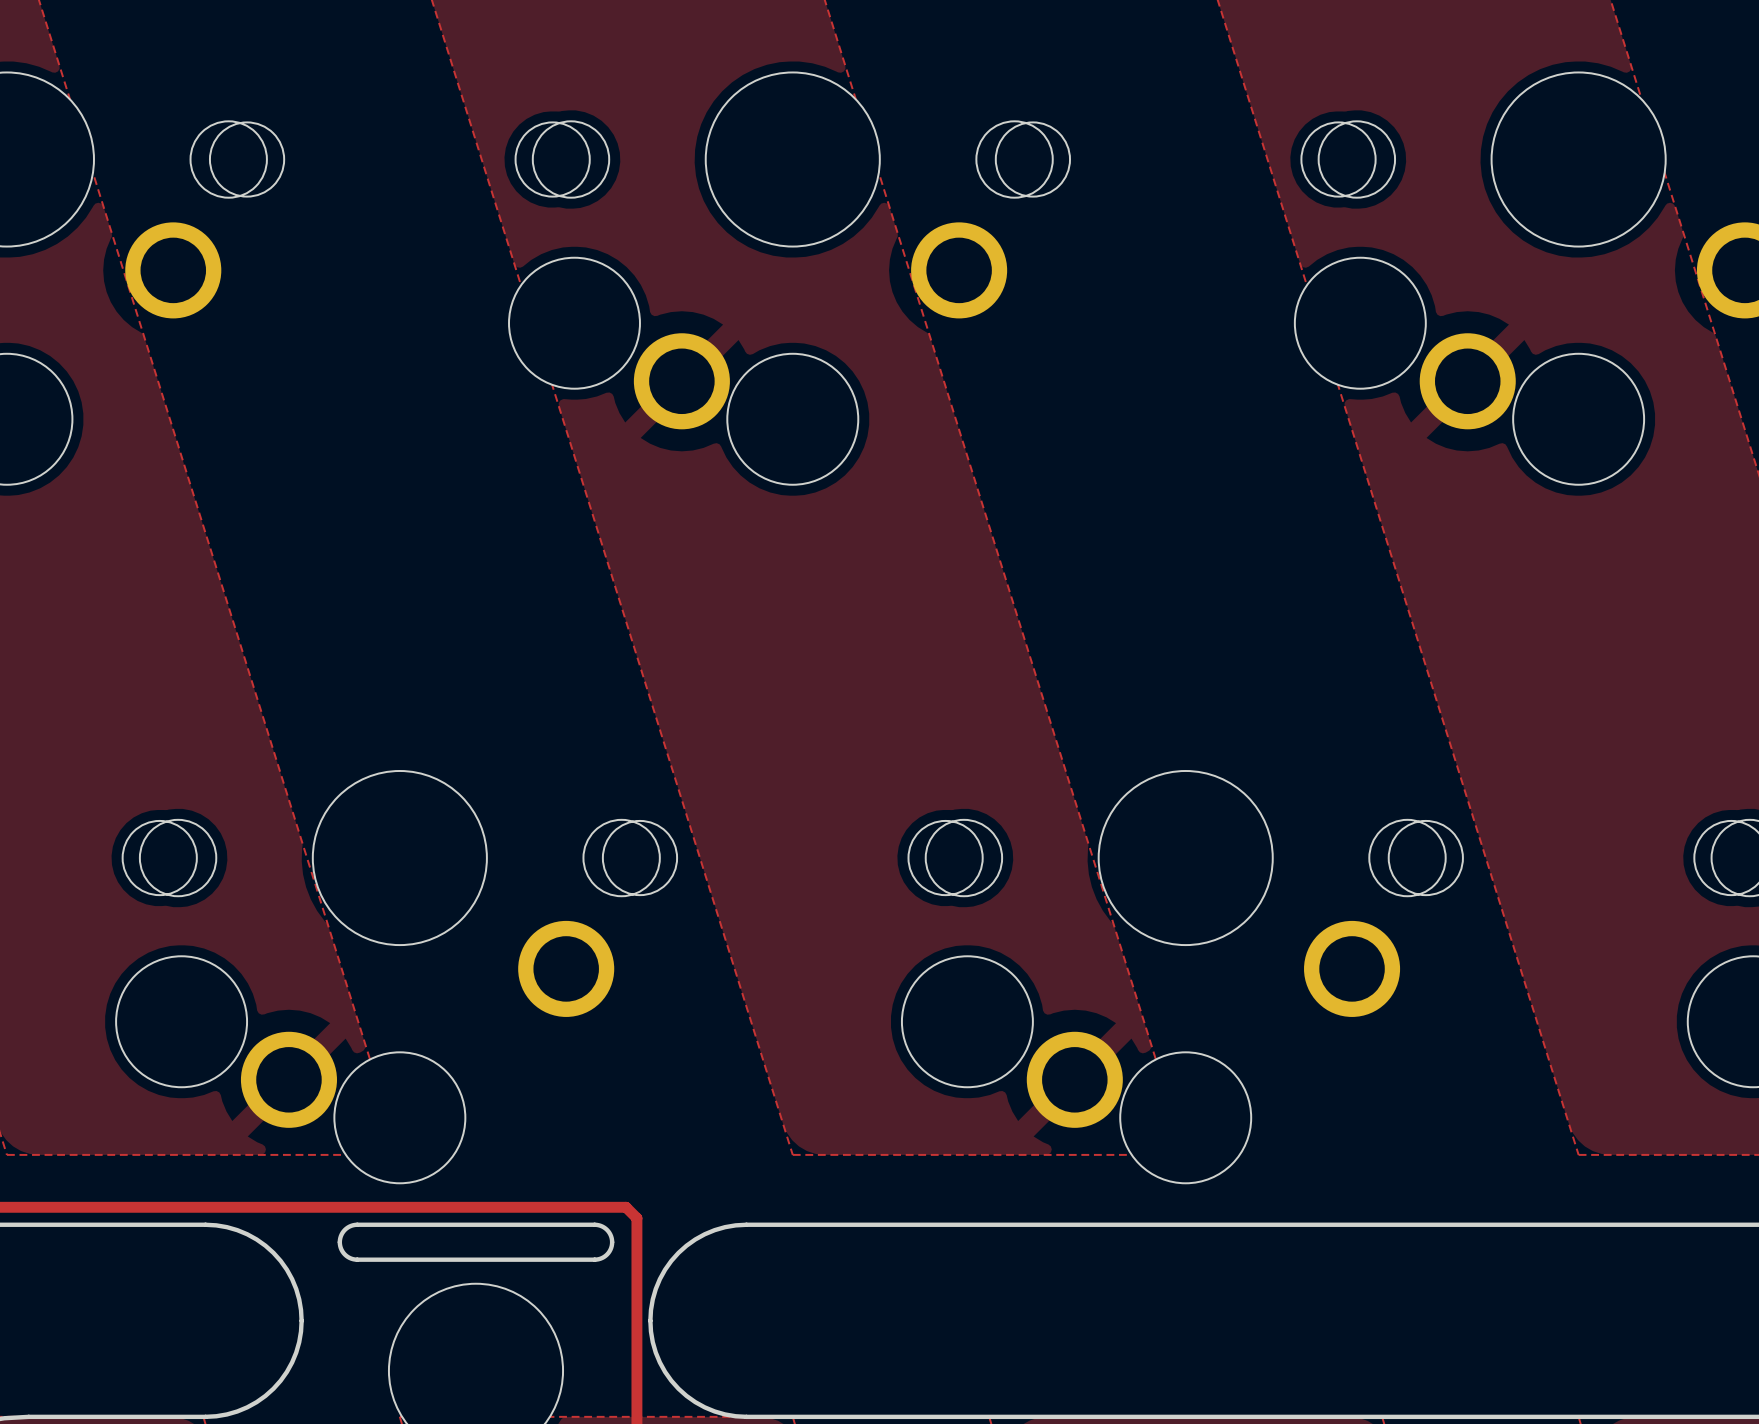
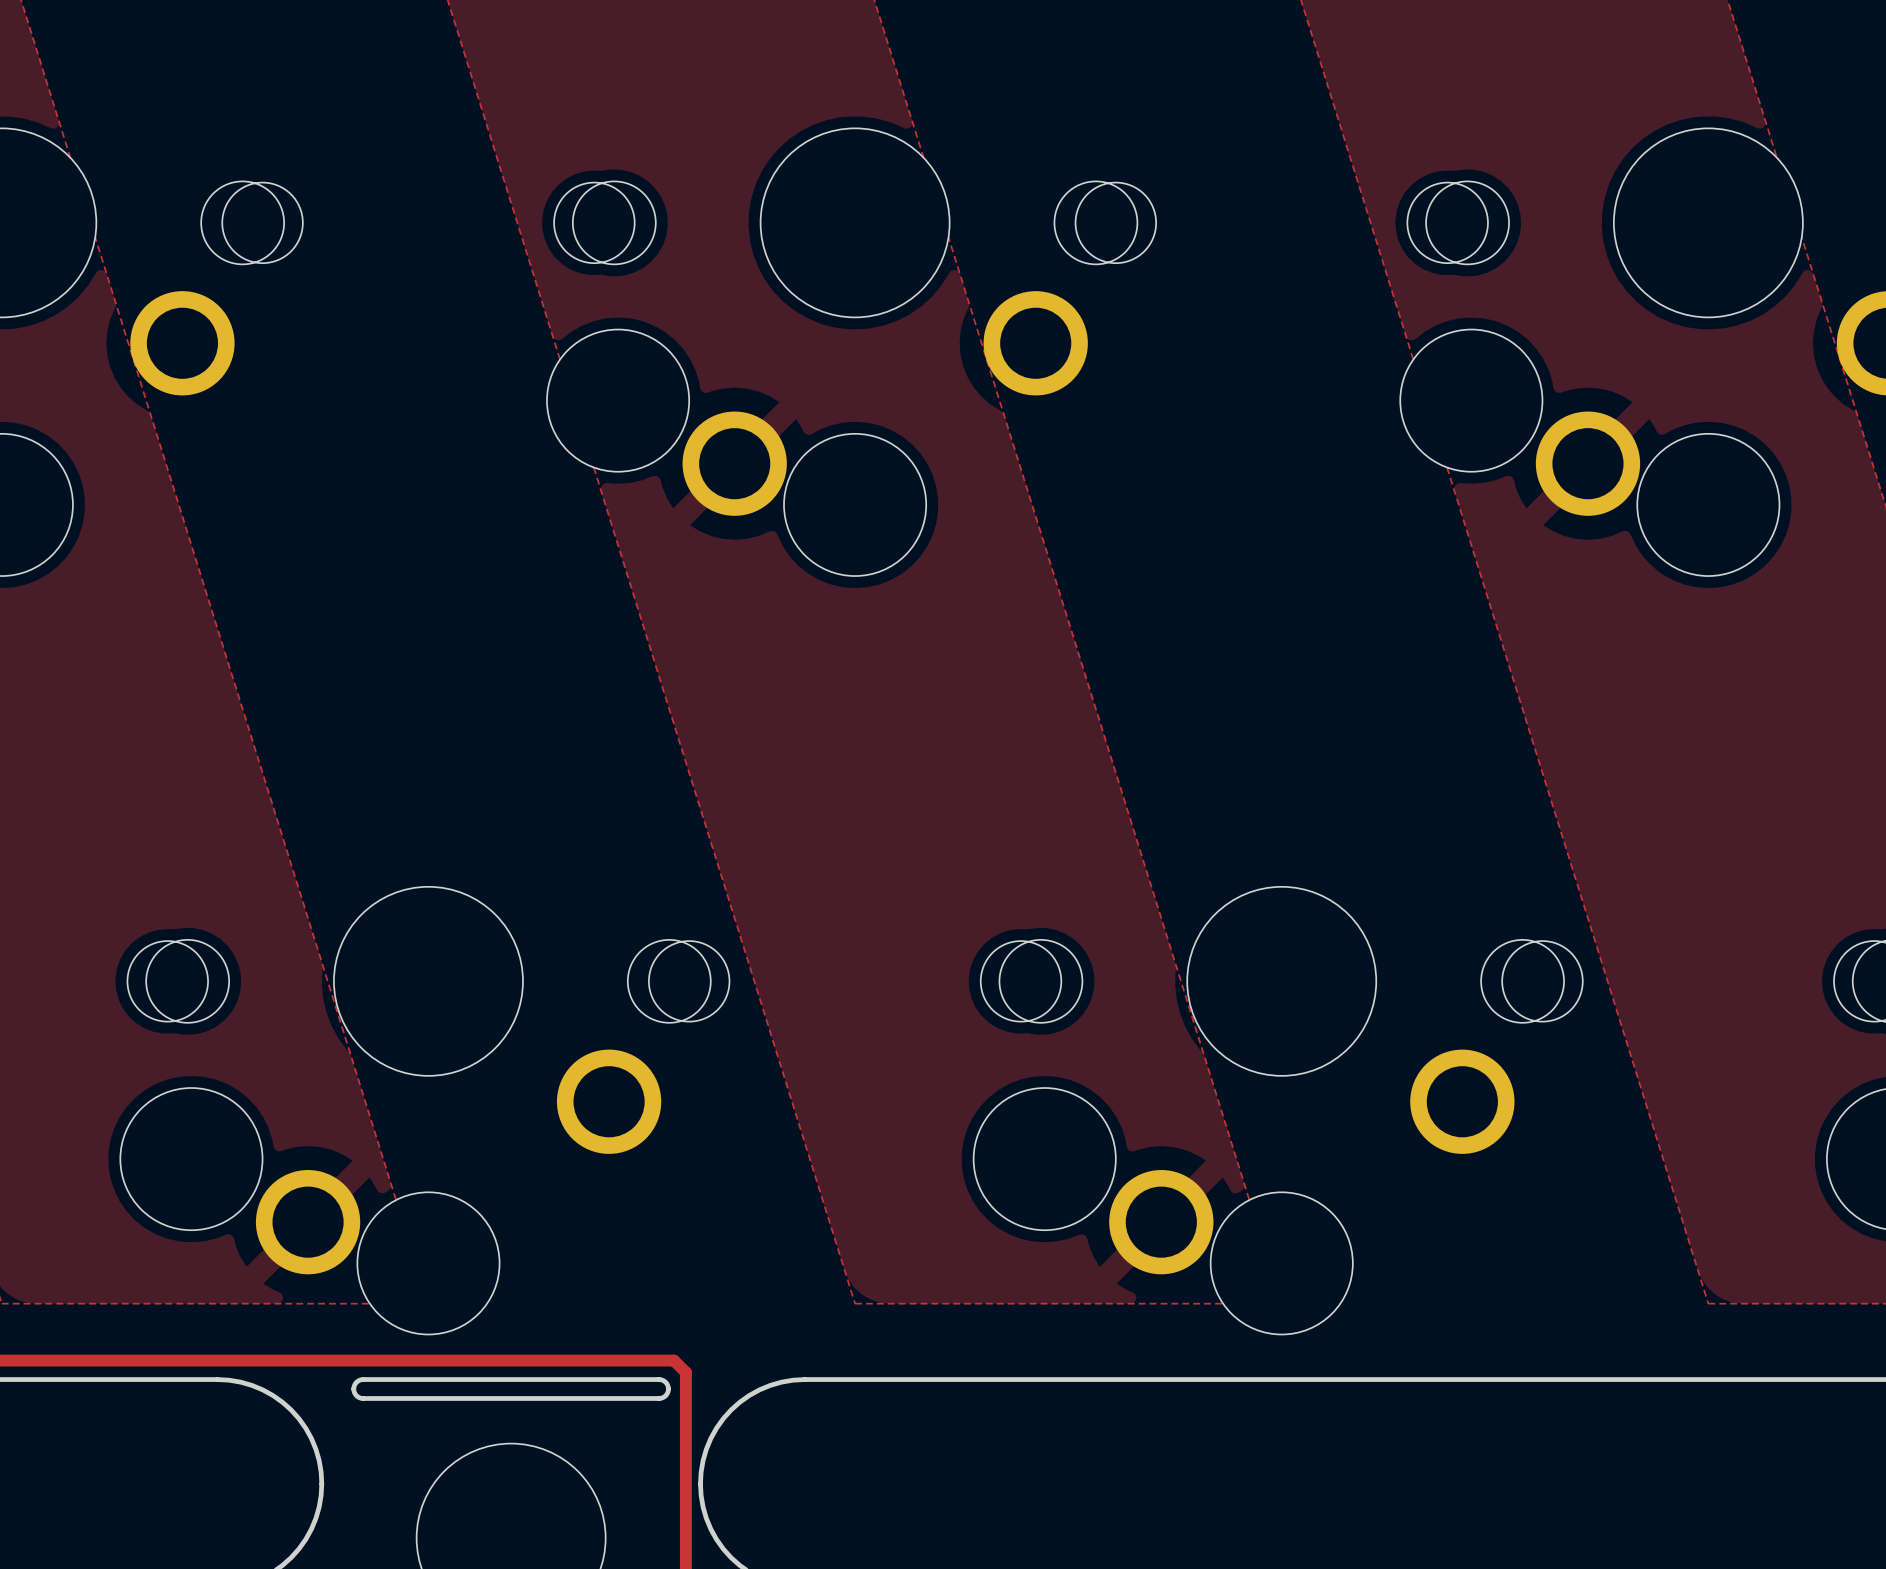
board edge: (357, 1224) (344, 1229) (339, 1242) (344, 1254) (357, 1259) (596, 1259) (608, 1253) (612, 1240) (607, 1229) (594, 1224) -> (382, 1379) (358, 1380) (354, 1386) (355, 1393) (363, 1398) (658, 1398) (667, 1393) (668, 1386) (663, 1380) (640, 1379)

